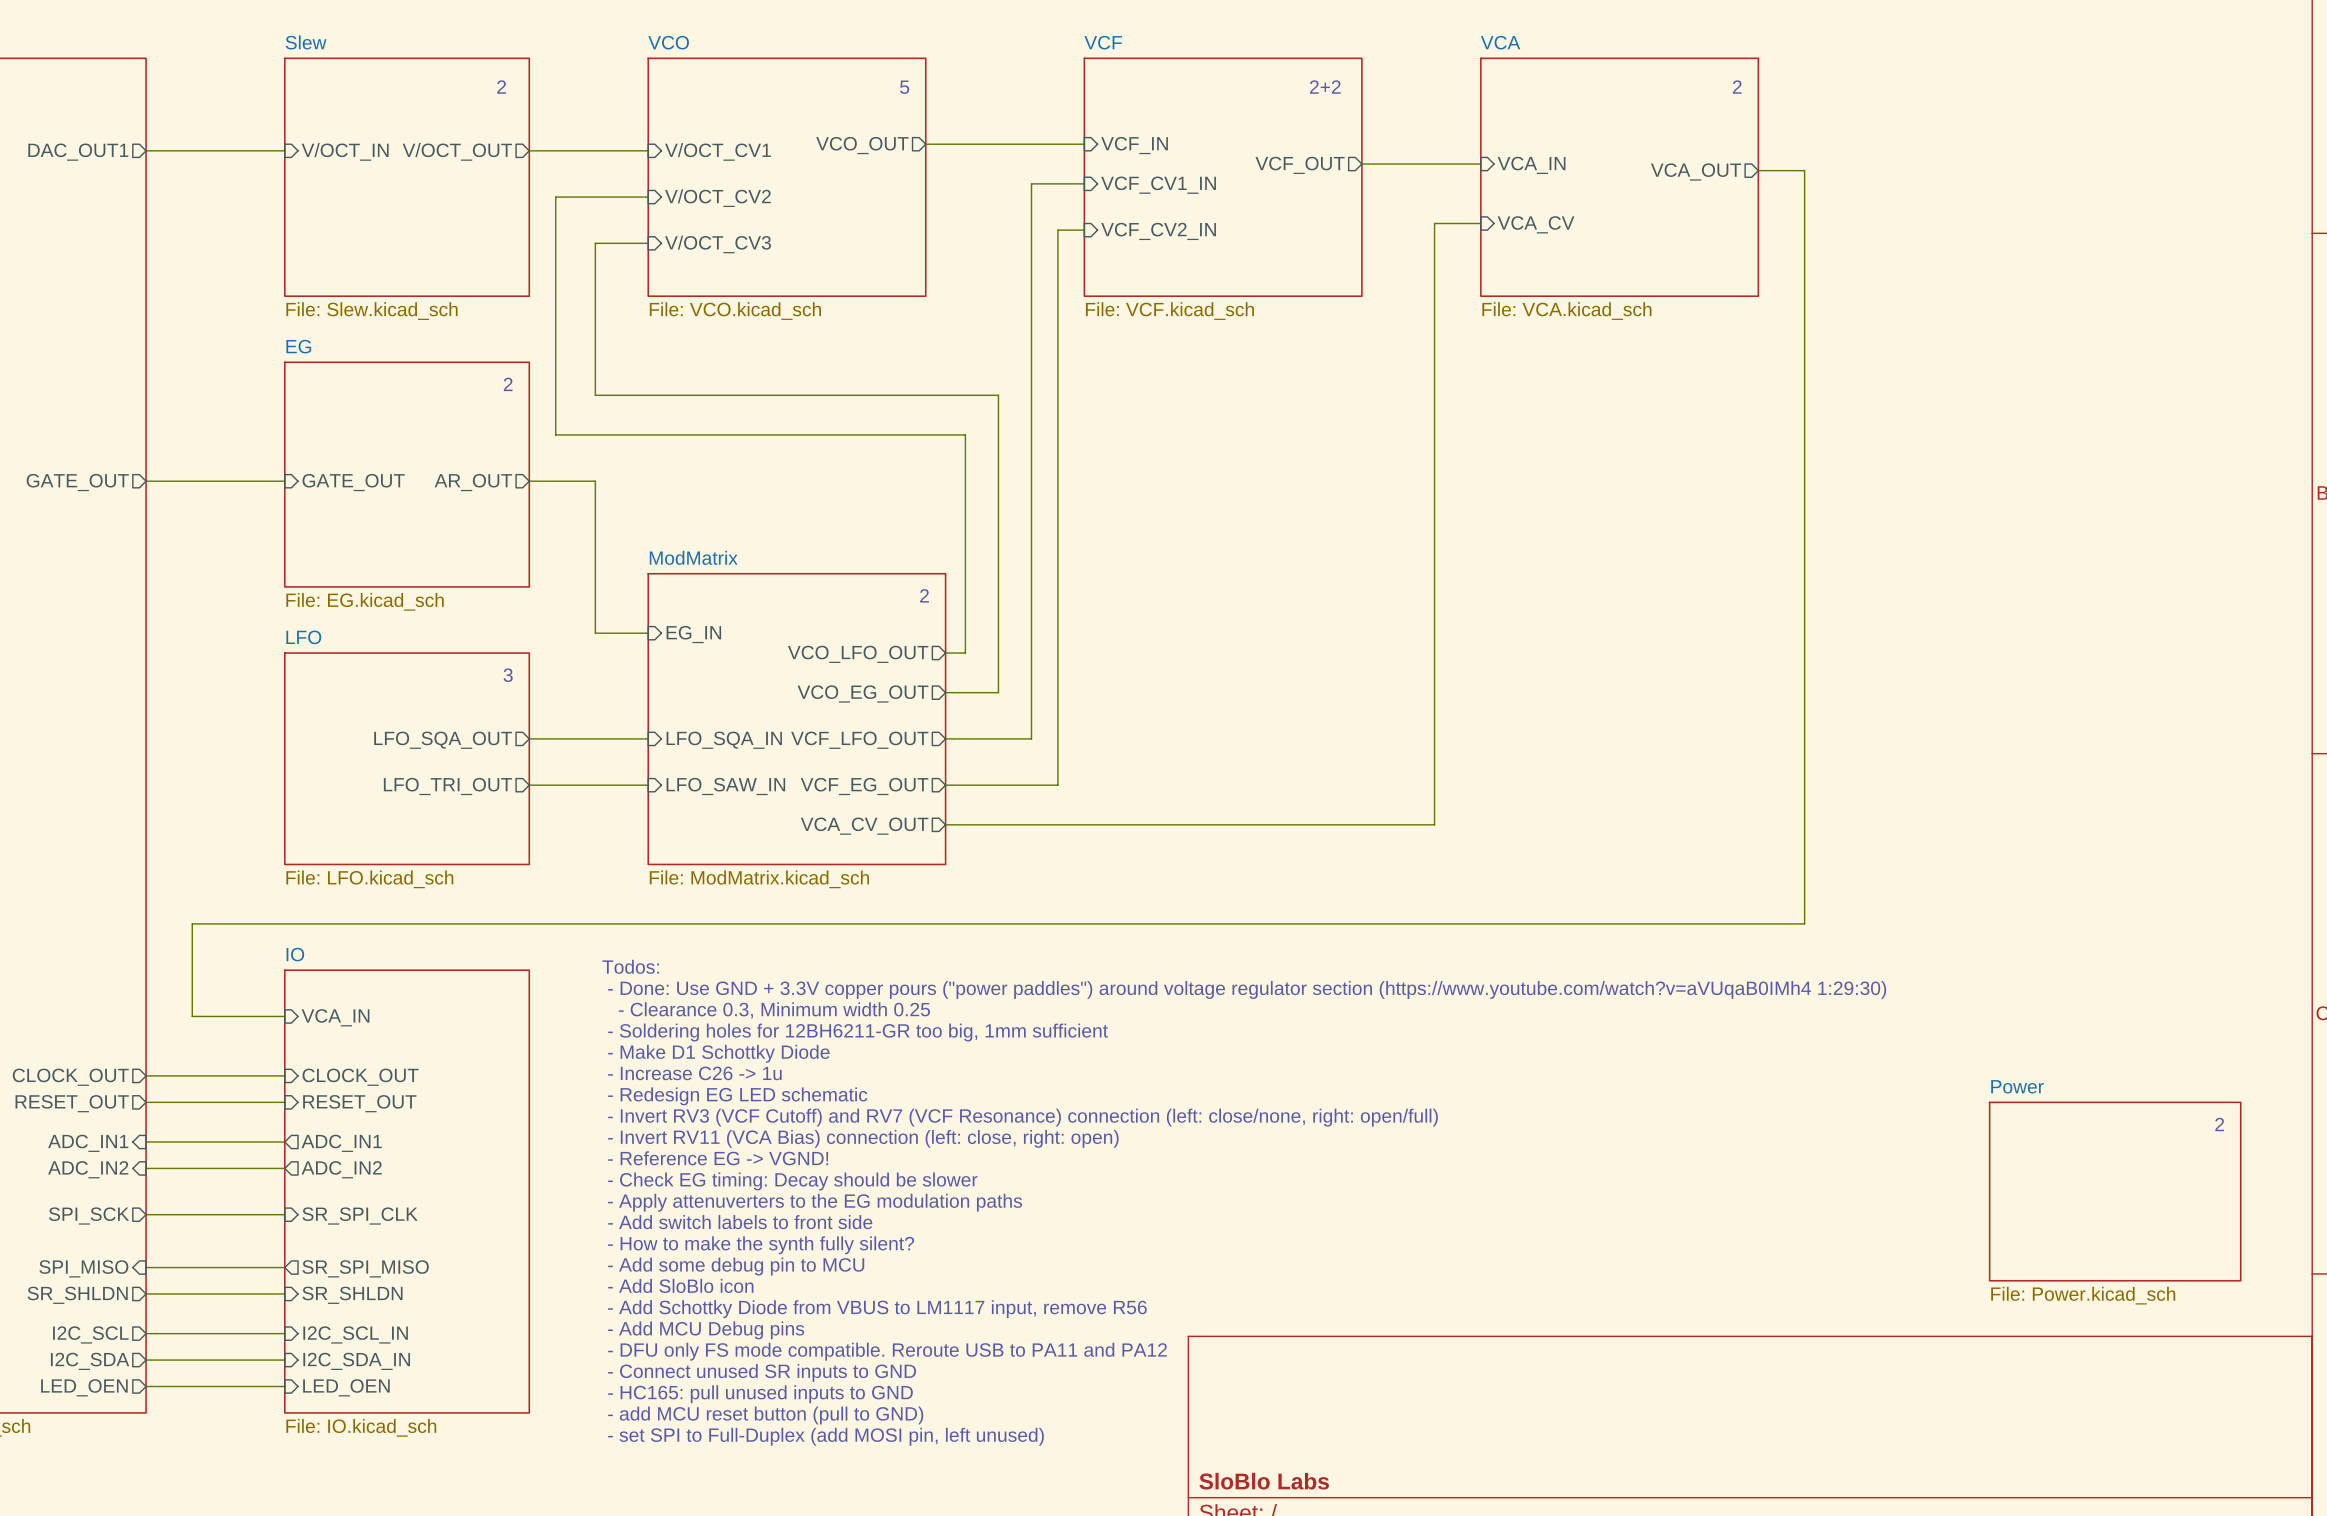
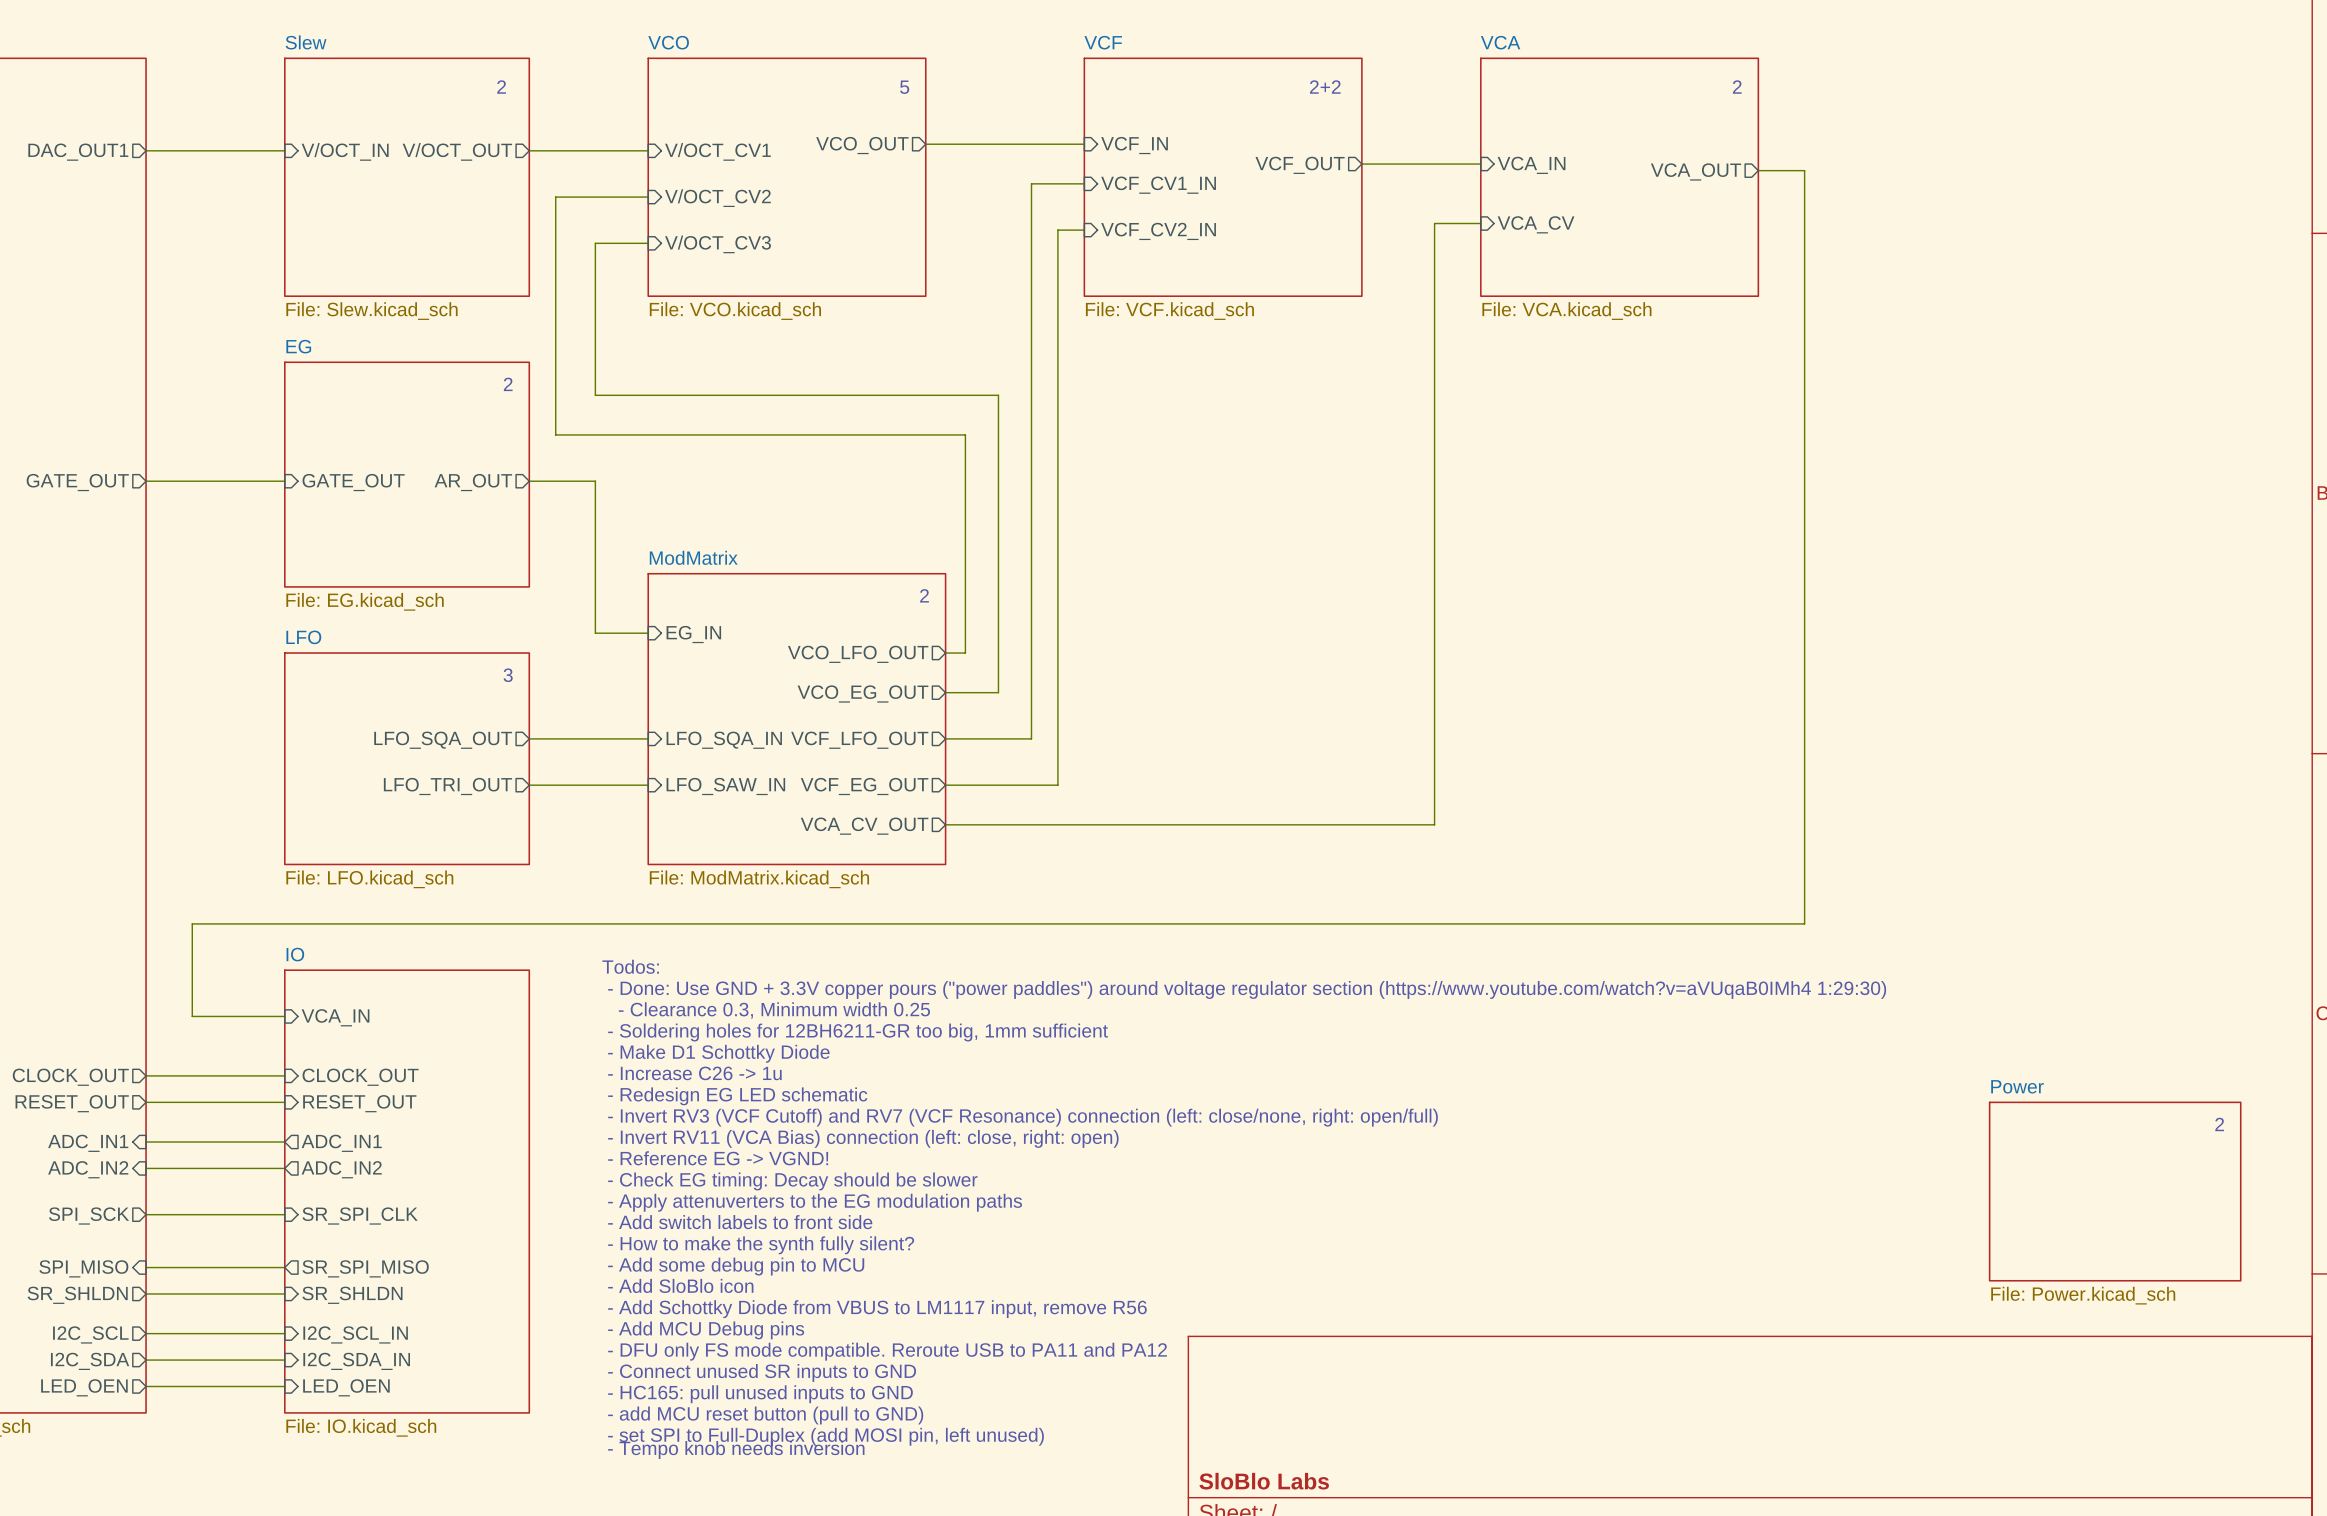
text: none -> - Tempo knob needs inversion (736, 1449)

